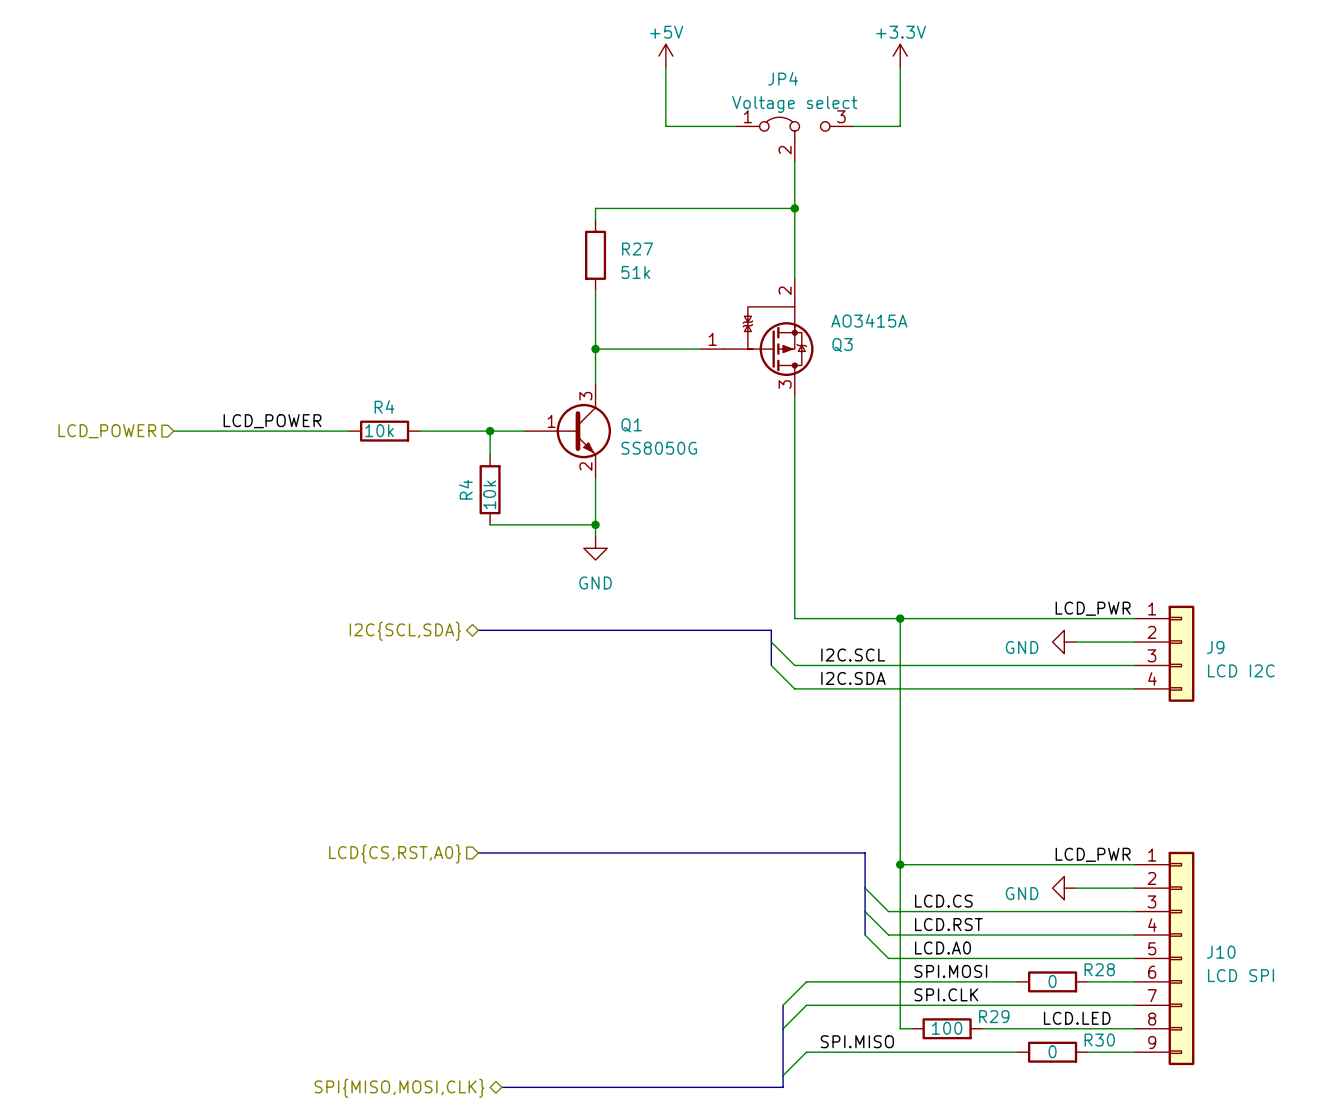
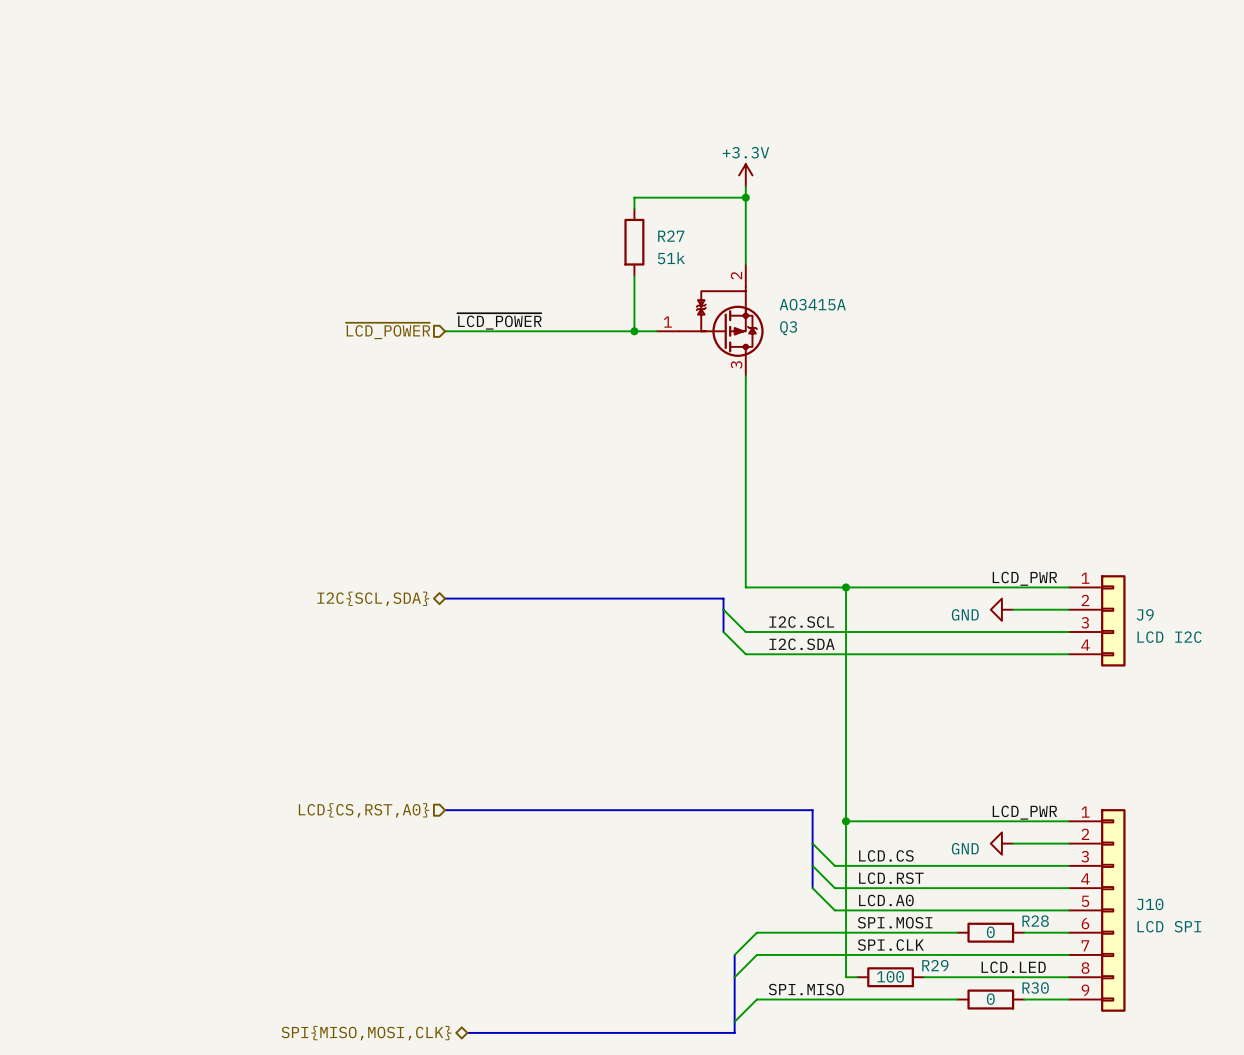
power symbol: +5V (665, 56) -> none
power symbol position: +3.3V (900, 56) -> +3.3V (745, 175)
wire: (665, 67) (665, 126) (736, 126) -> none
wire: (900, 67) (900, 126) (853, 126) -> none
JP4: Voltage select (794, 139) -> none
wire: (677, 208) (595, 208) (595, 220) -> (634, 197) (634, 208)
R27 position: (595, 255) -> (634, 242)
wire: (595, 290) (595, 384) -> none
label: none -> ~{LCD_POWER} (499, 321)
hierarchical label: none -> ~{LCD_POWER} (388, 330)
wire: none -> (445, 331) (556, 331)
junction: (595, 349) -> none
junction: none -> (634, 331)
label: LCD_POWER (272, 421) -> none
hierarchical label: LCD_POWER (107, 431) -> none
wire: (173, 431) (349, 431) -> none
R4: 10k (384, 431) -> none
wire: (419, 431) (525, 431) -> none
wire: (490, 431) (490, 454) -> none
junction: (490, 431) -> none
Q1: SS8050G (568, 431) -> none
wire: (595, 477) (595, 536) -> (634, 275) (634, 331)
R4: 10k (490, 489) -> none
wire: (490, 524) (595, 524) -> none
junction: (595, 524) -> none
power symbol: GND (595, 548) -> none

